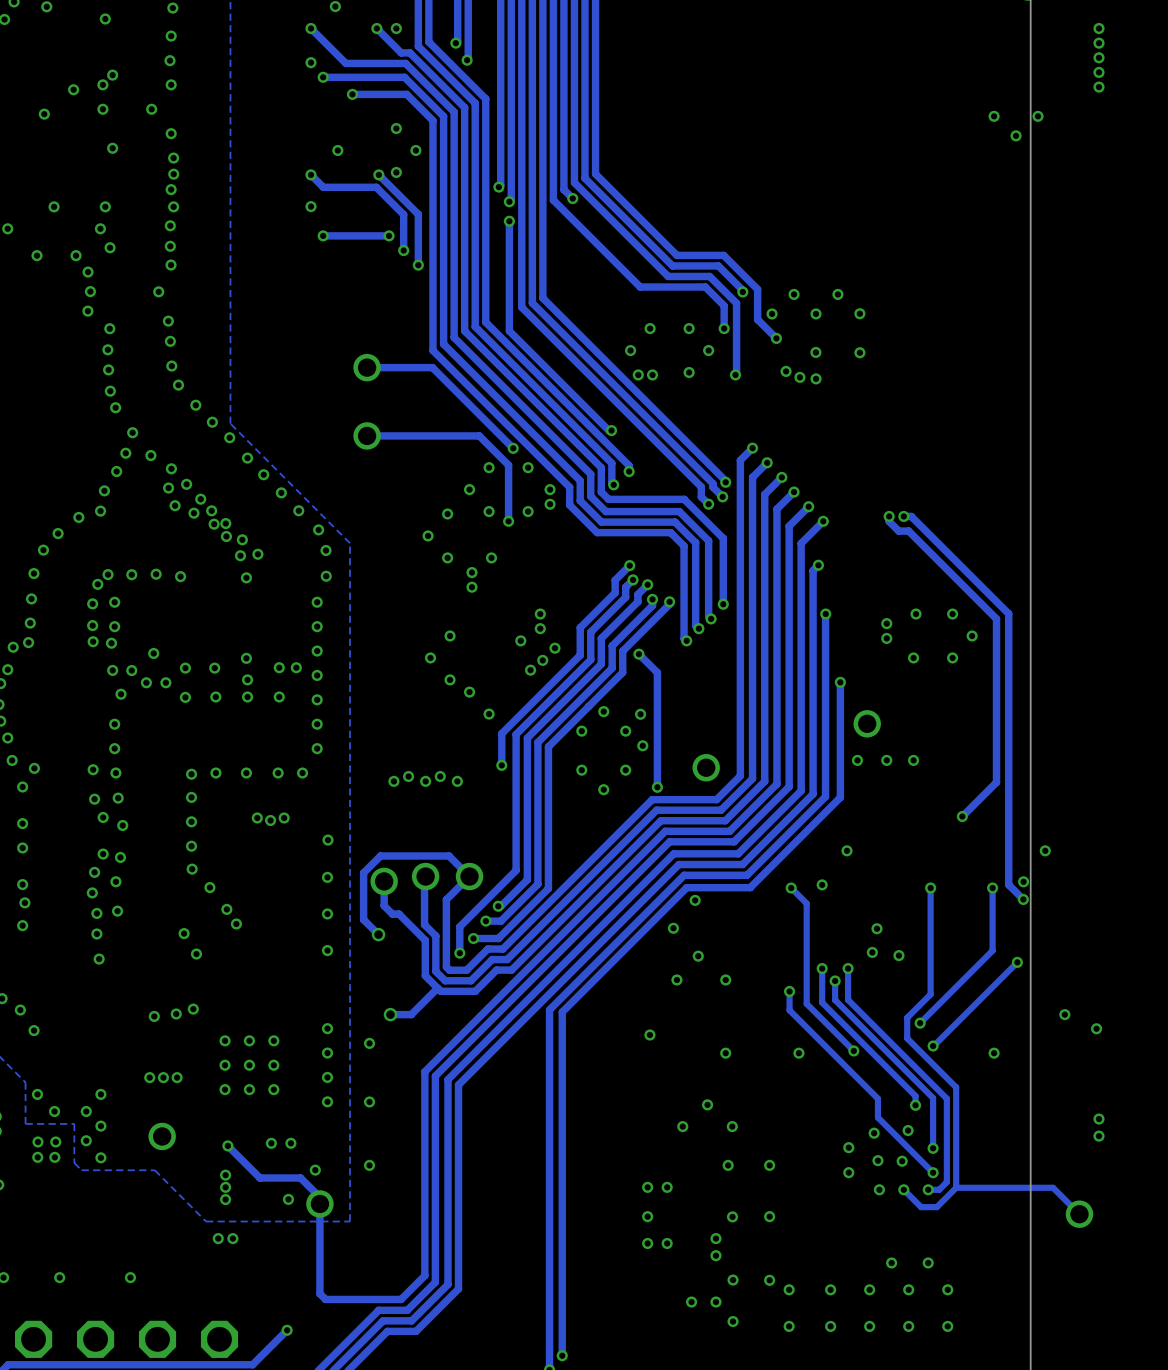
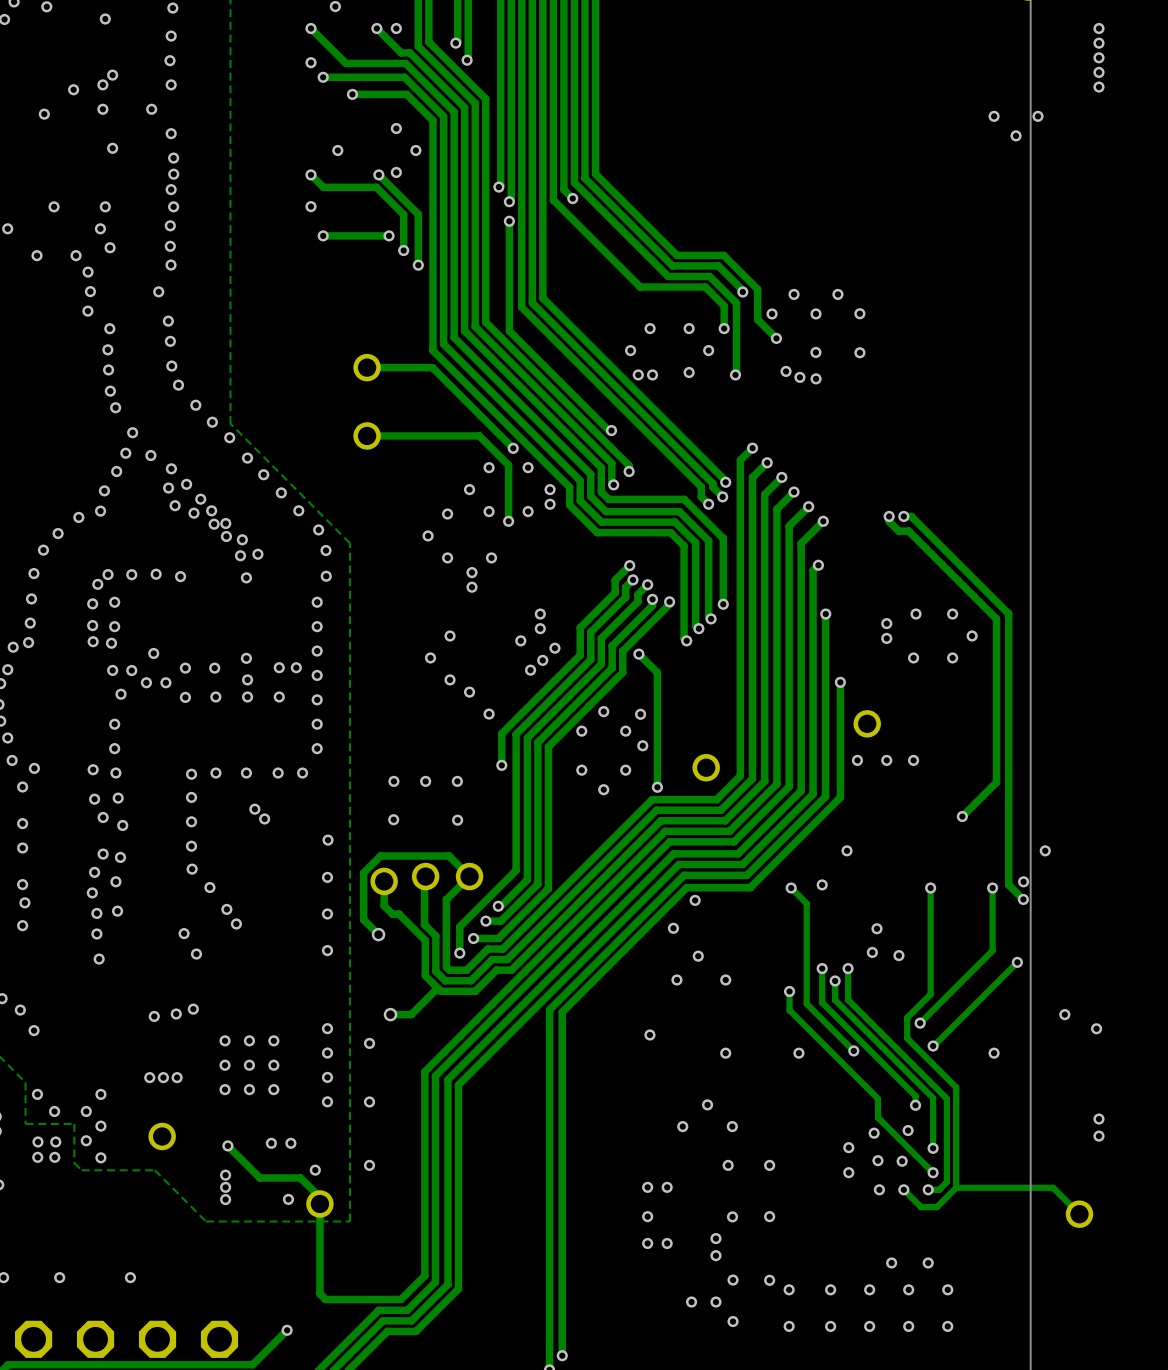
via: (408, 776) -> none
via: (440, 776) -> none
via: none -> (254, 809)
via: (257, 817) -> none
via: (284, 817) -> none
via: none -> (264, 818)
via: none -> (393, 819)
via: (270, 820) -> none
via: none -> (457, 820)
via: (218, 1238) -> none
via: (232, 1238) -> none

